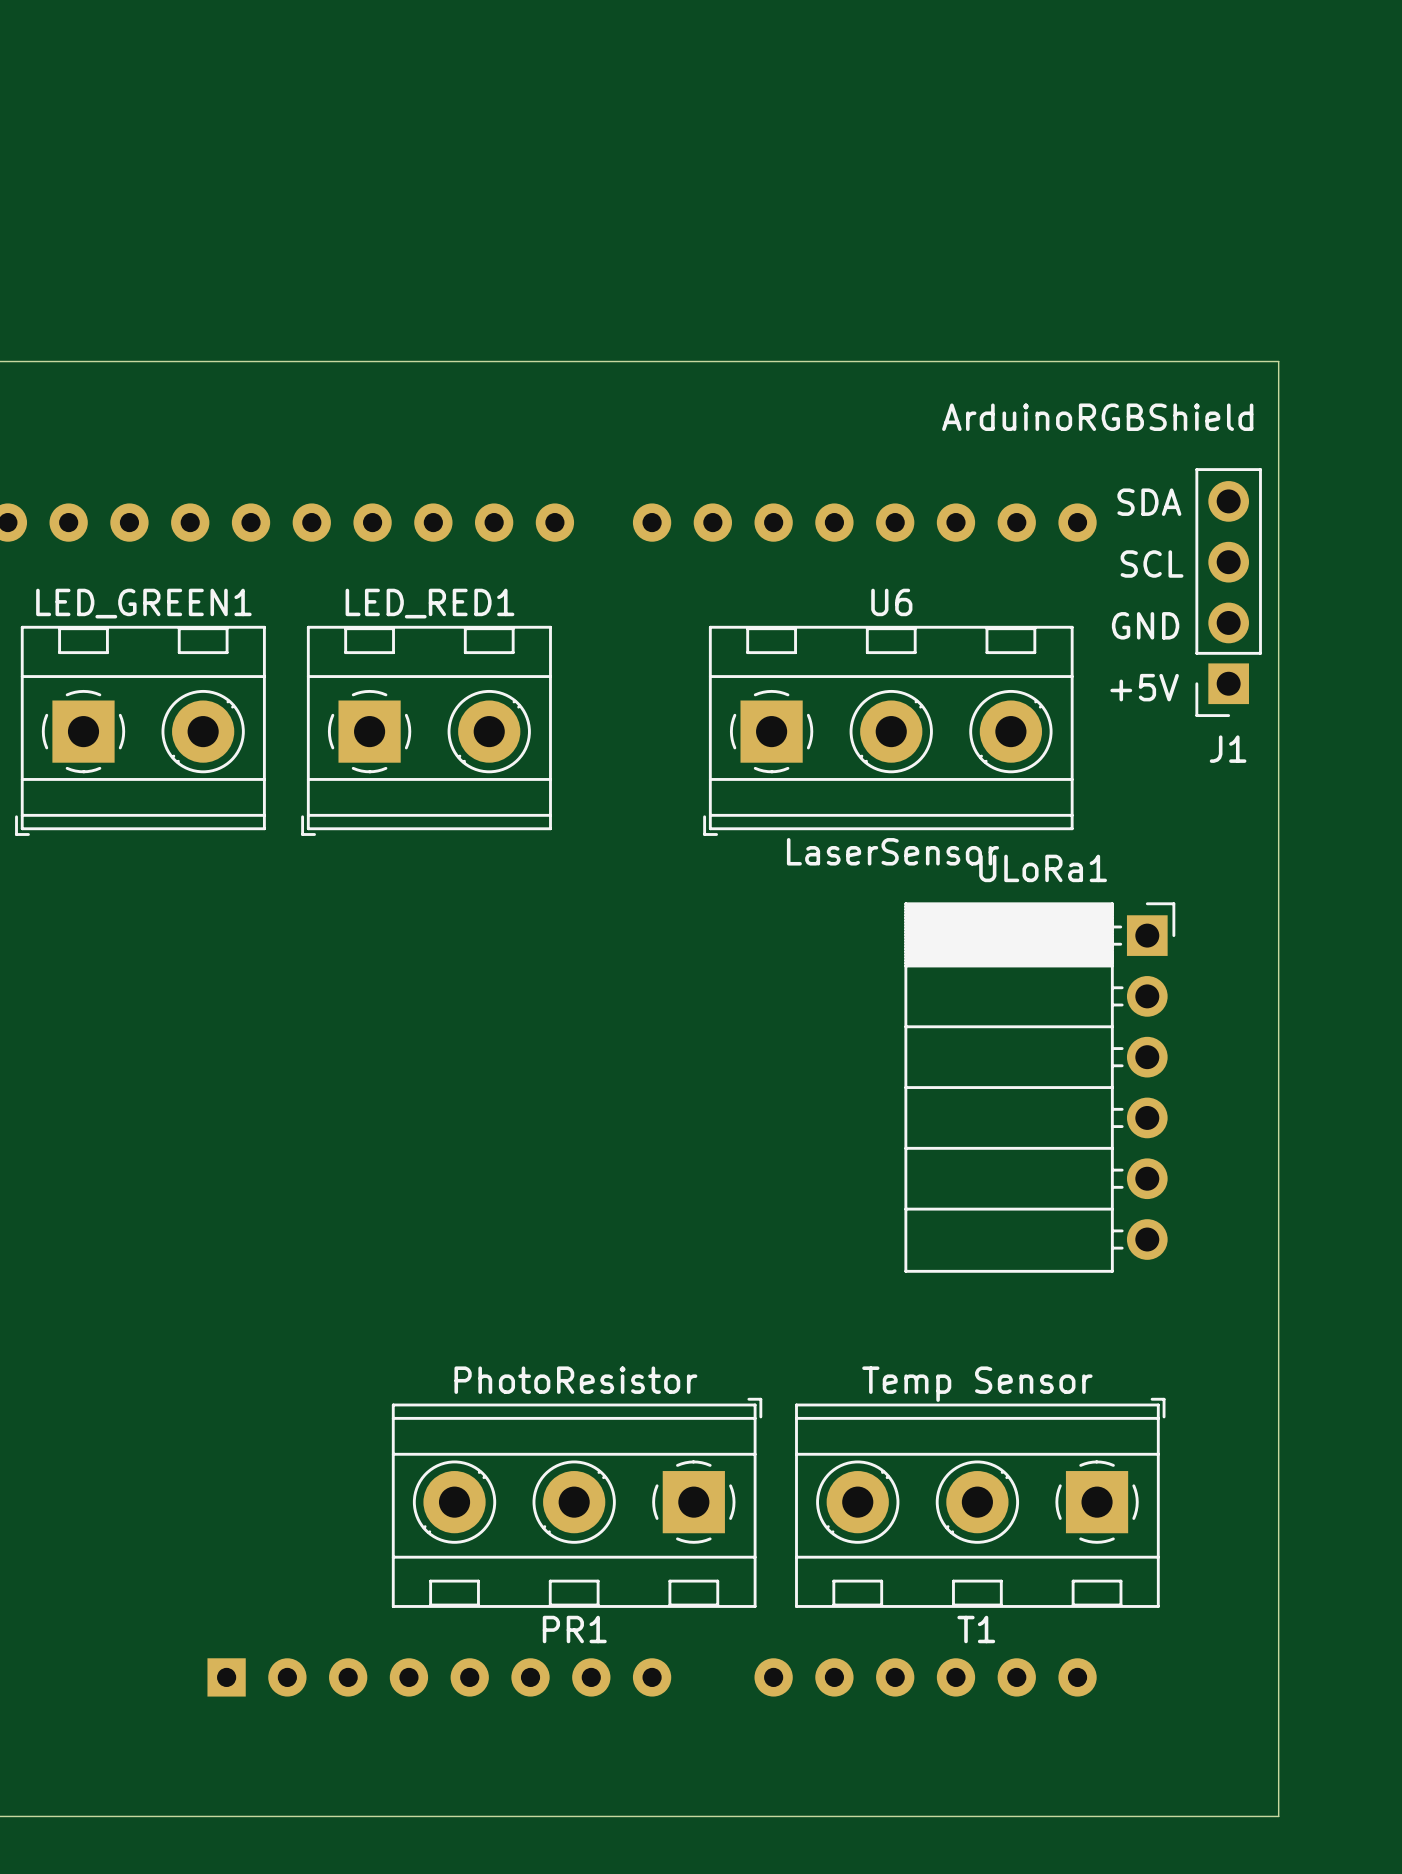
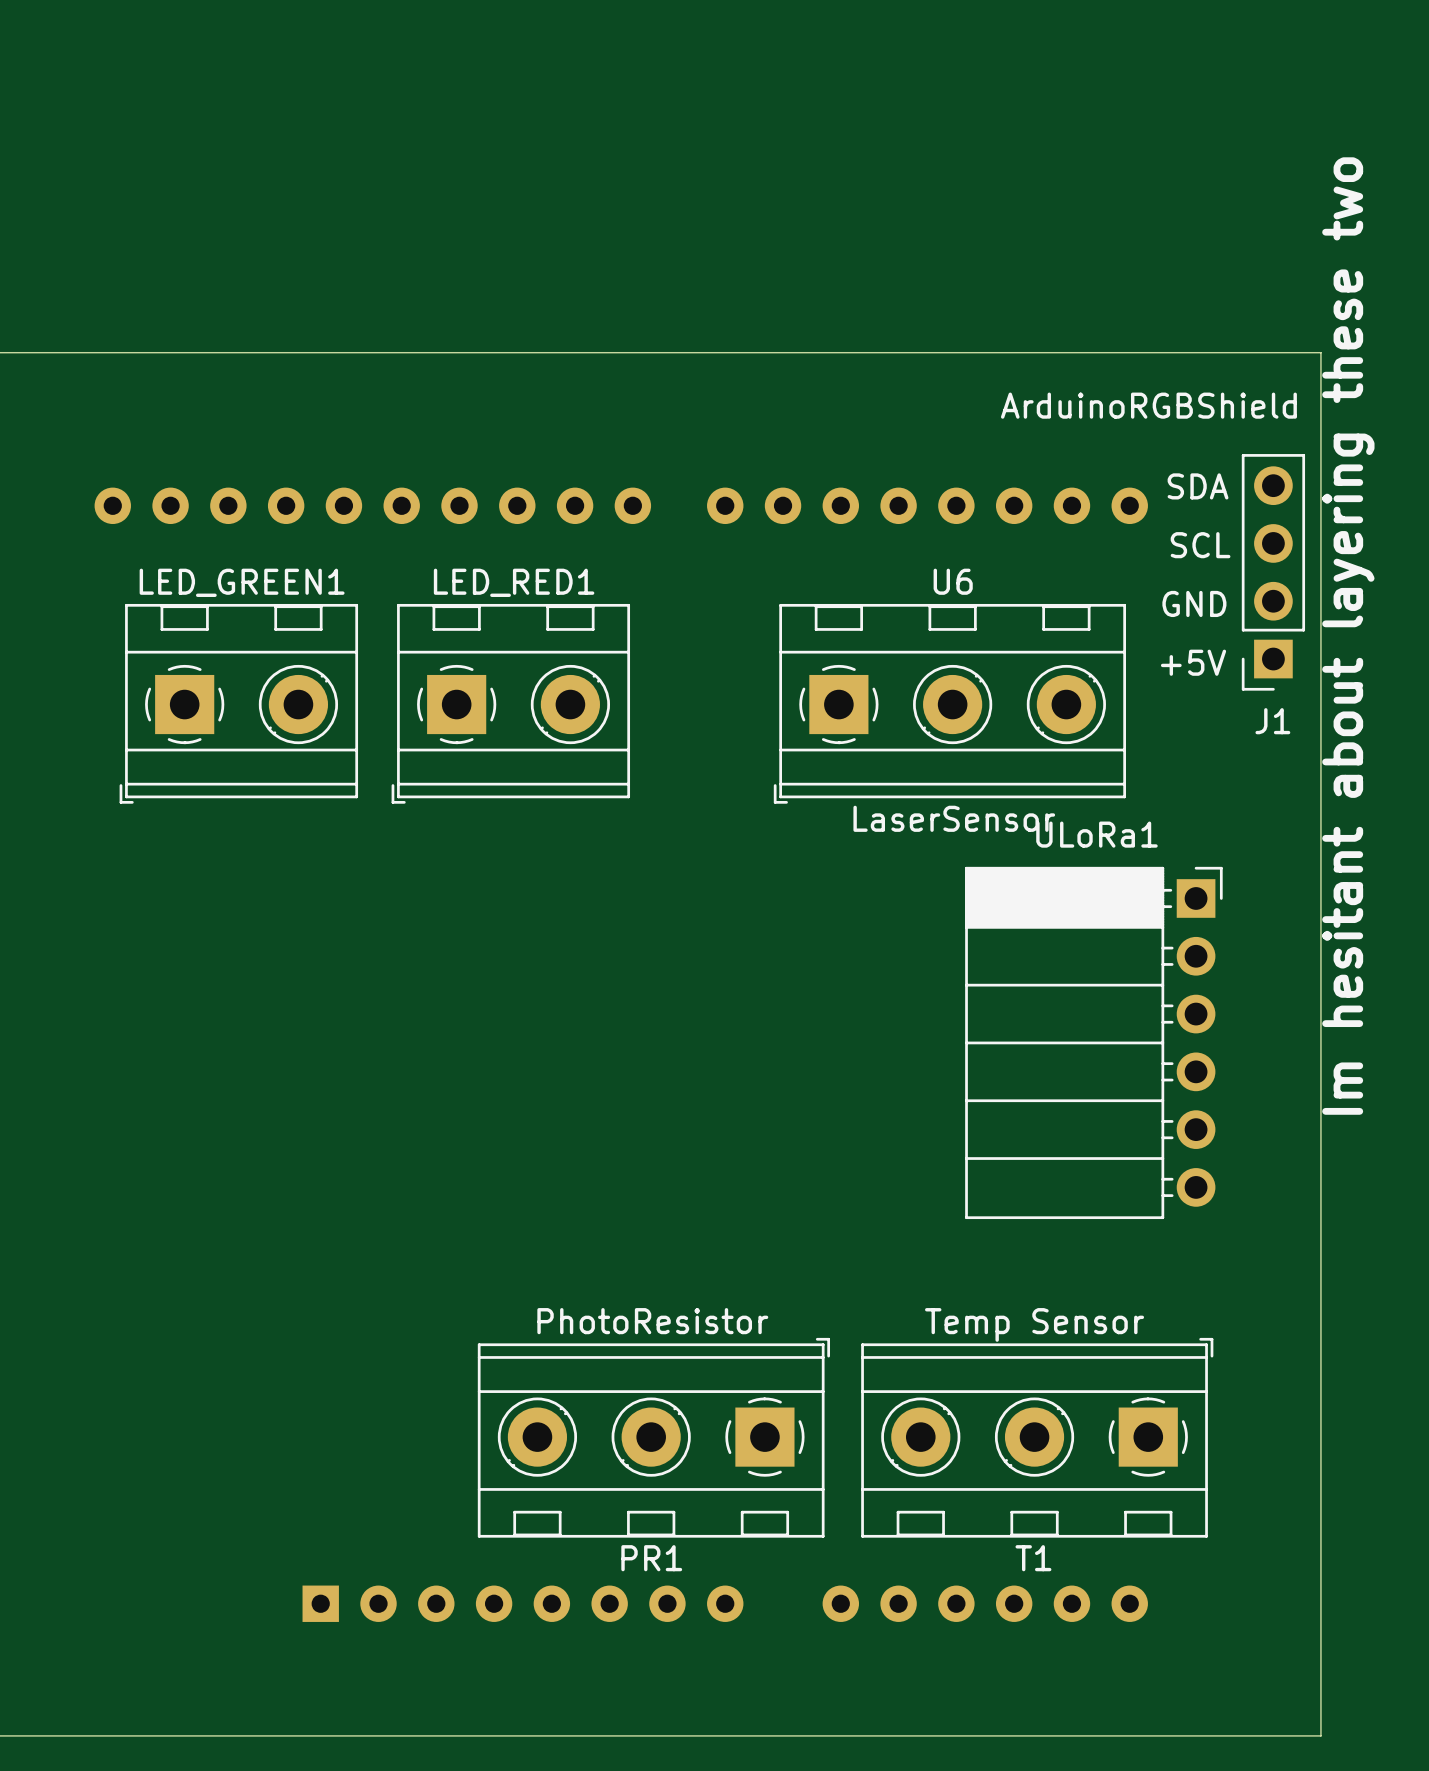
text: none -> Im hesitant about layering these two (1348, 636)

